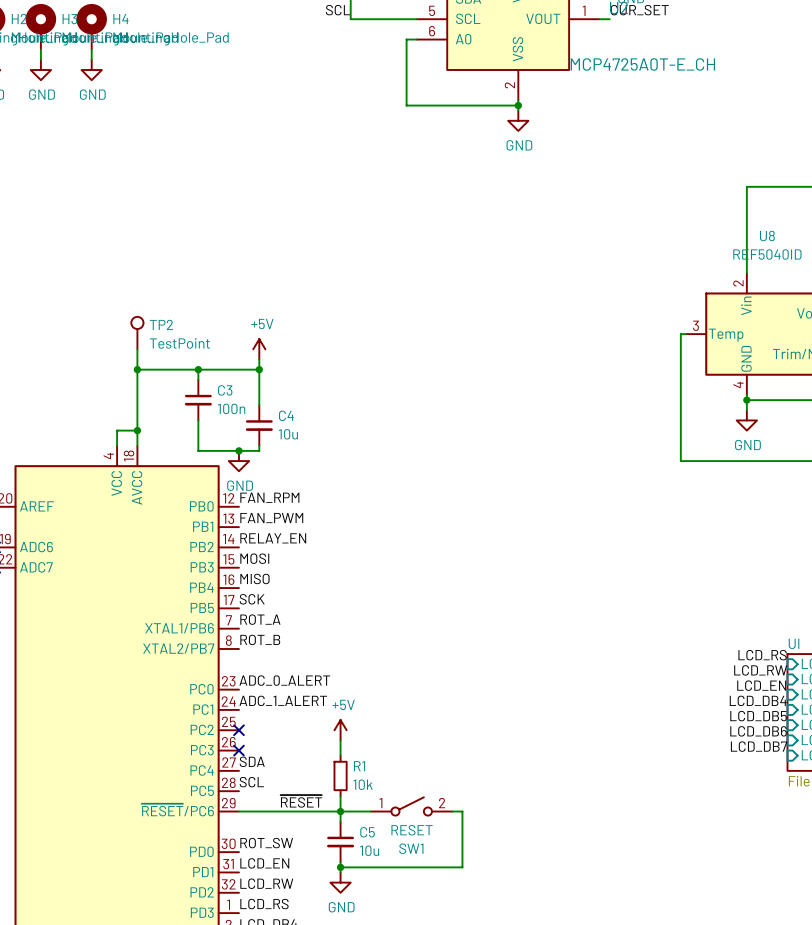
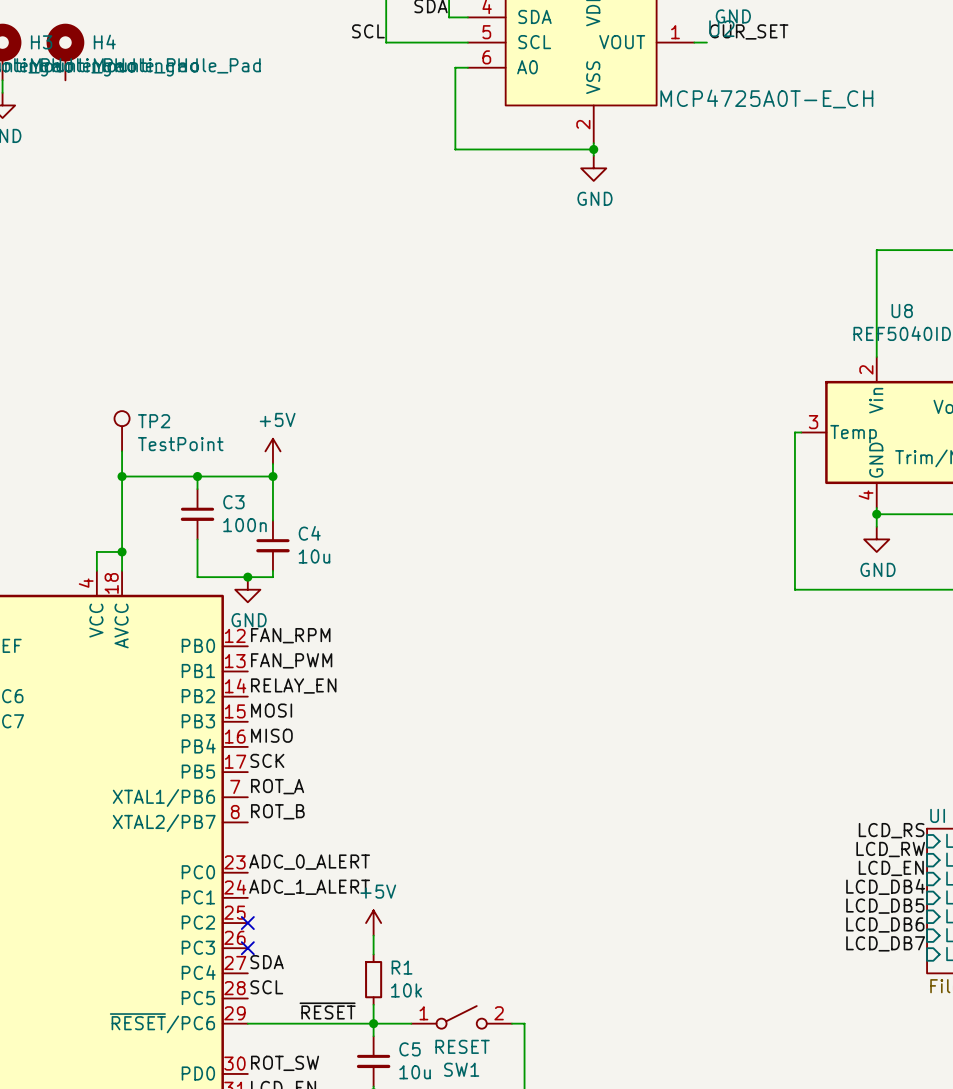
wire: (91, 49) (91, 59) -> none
power symbol: GND (91, 70) -> none

